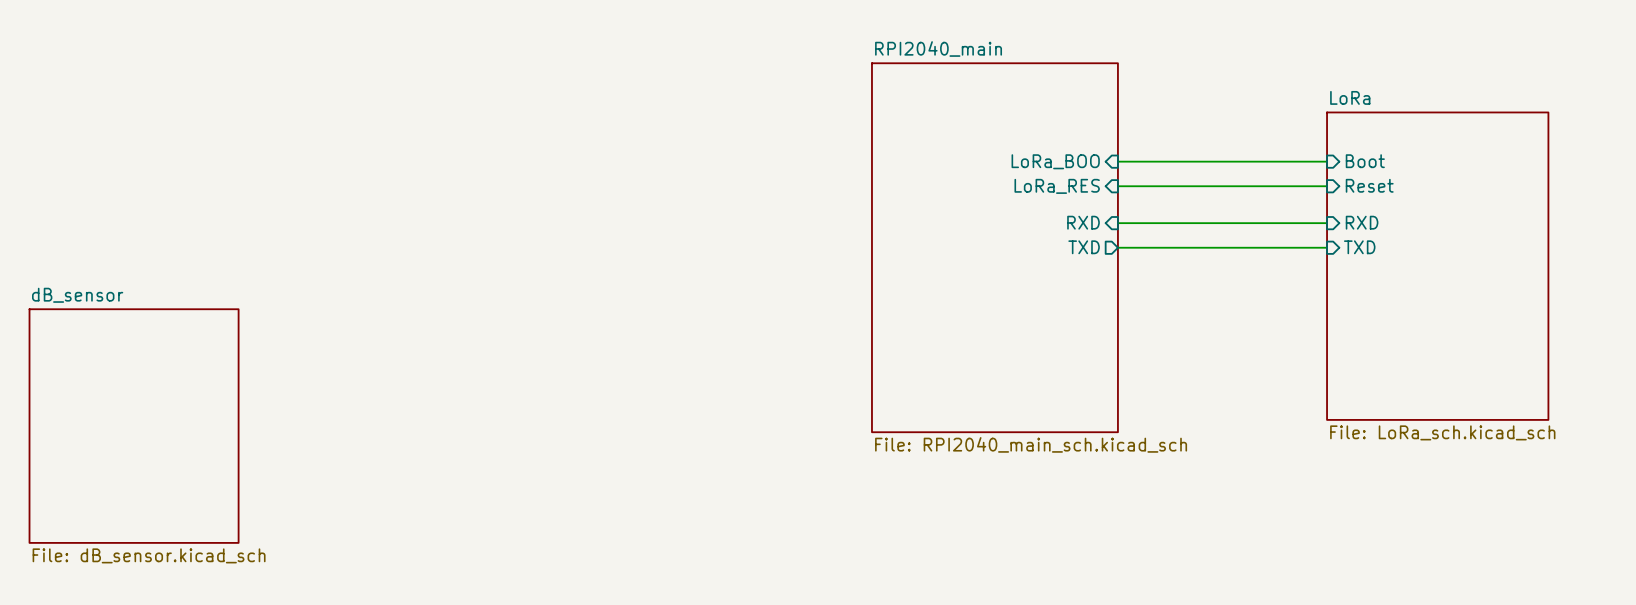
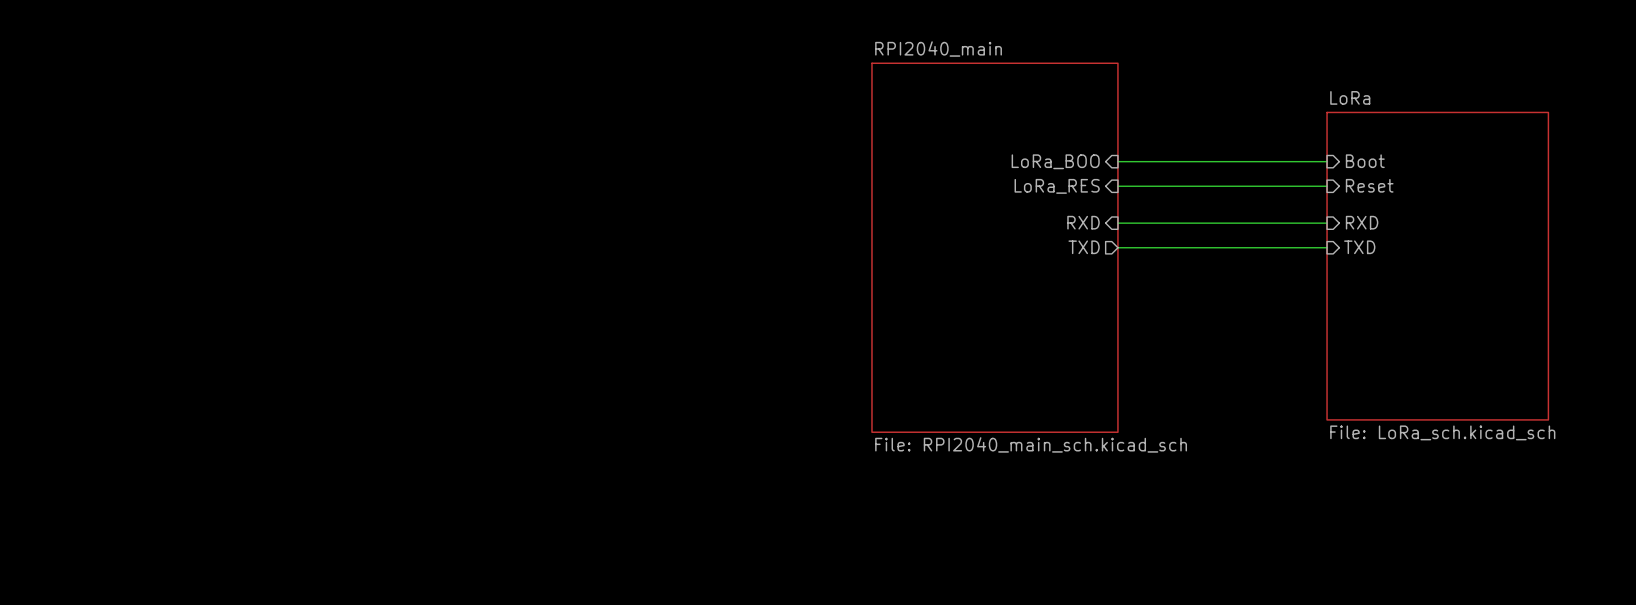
sheet dB_sensor: File: dB_sensor.kicad_sch (134, 426) -> none

